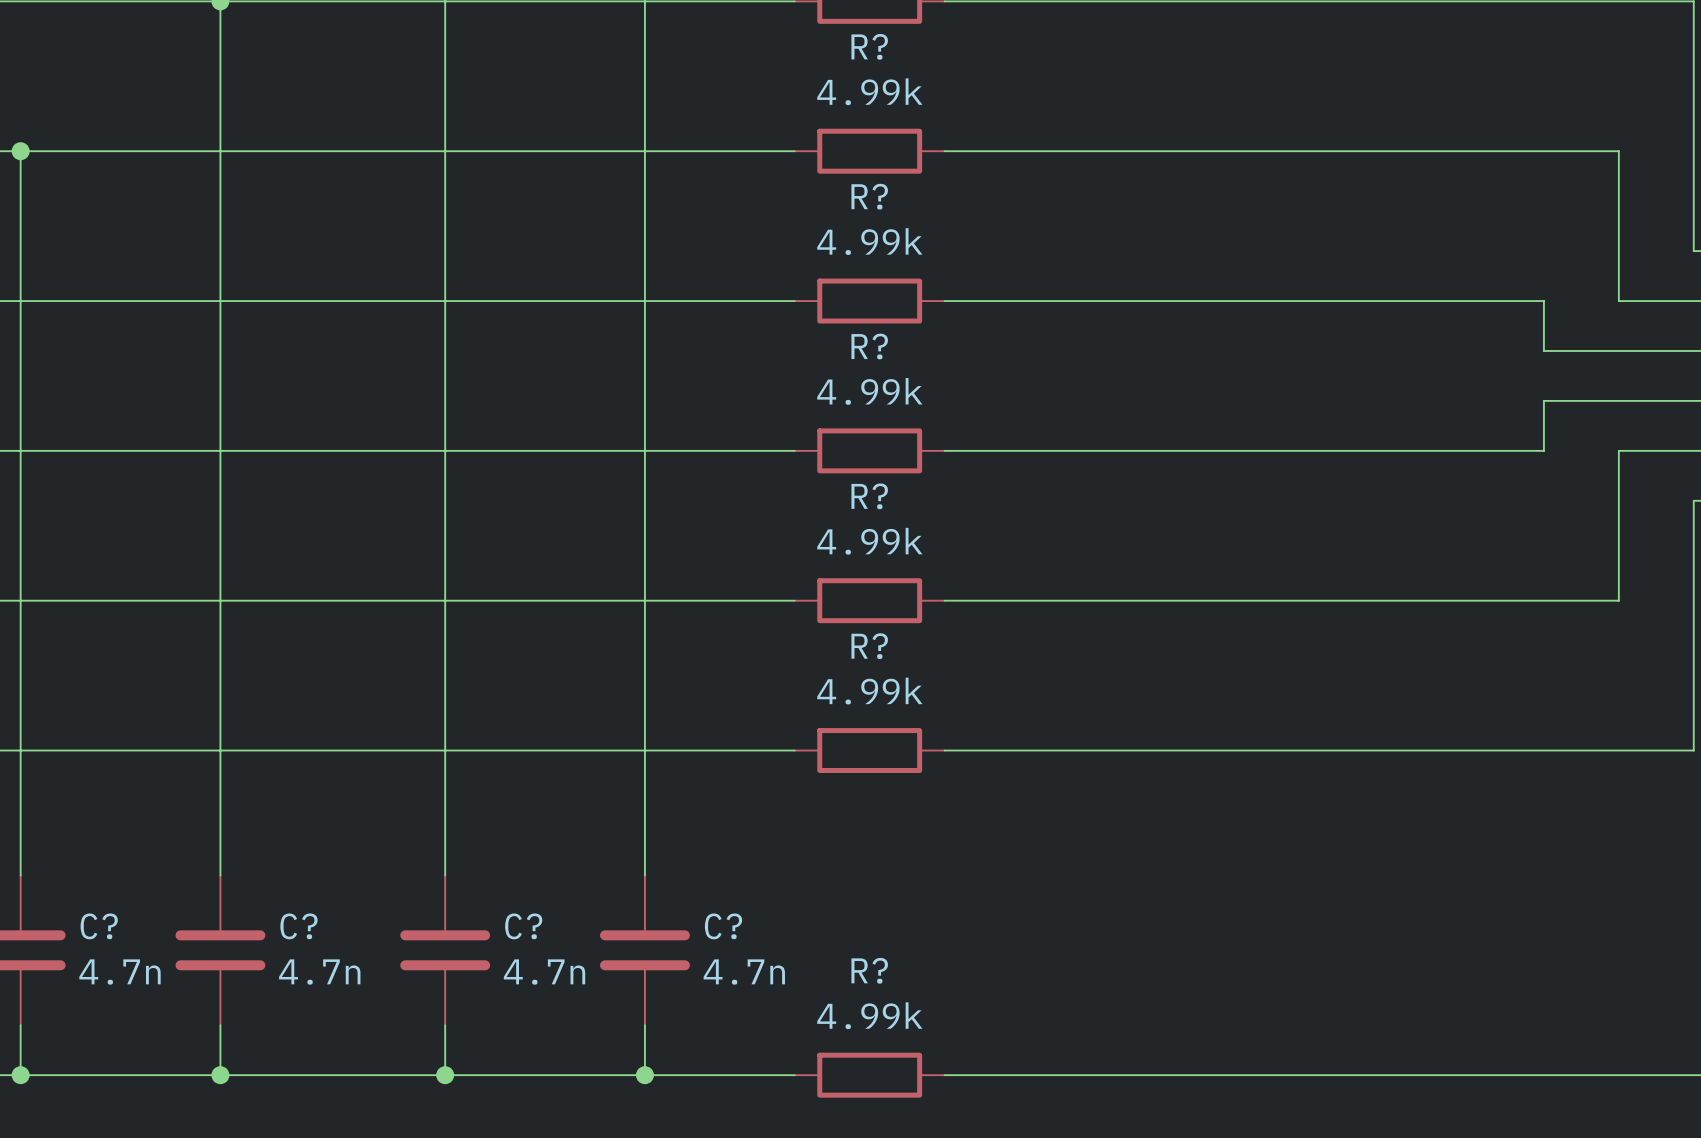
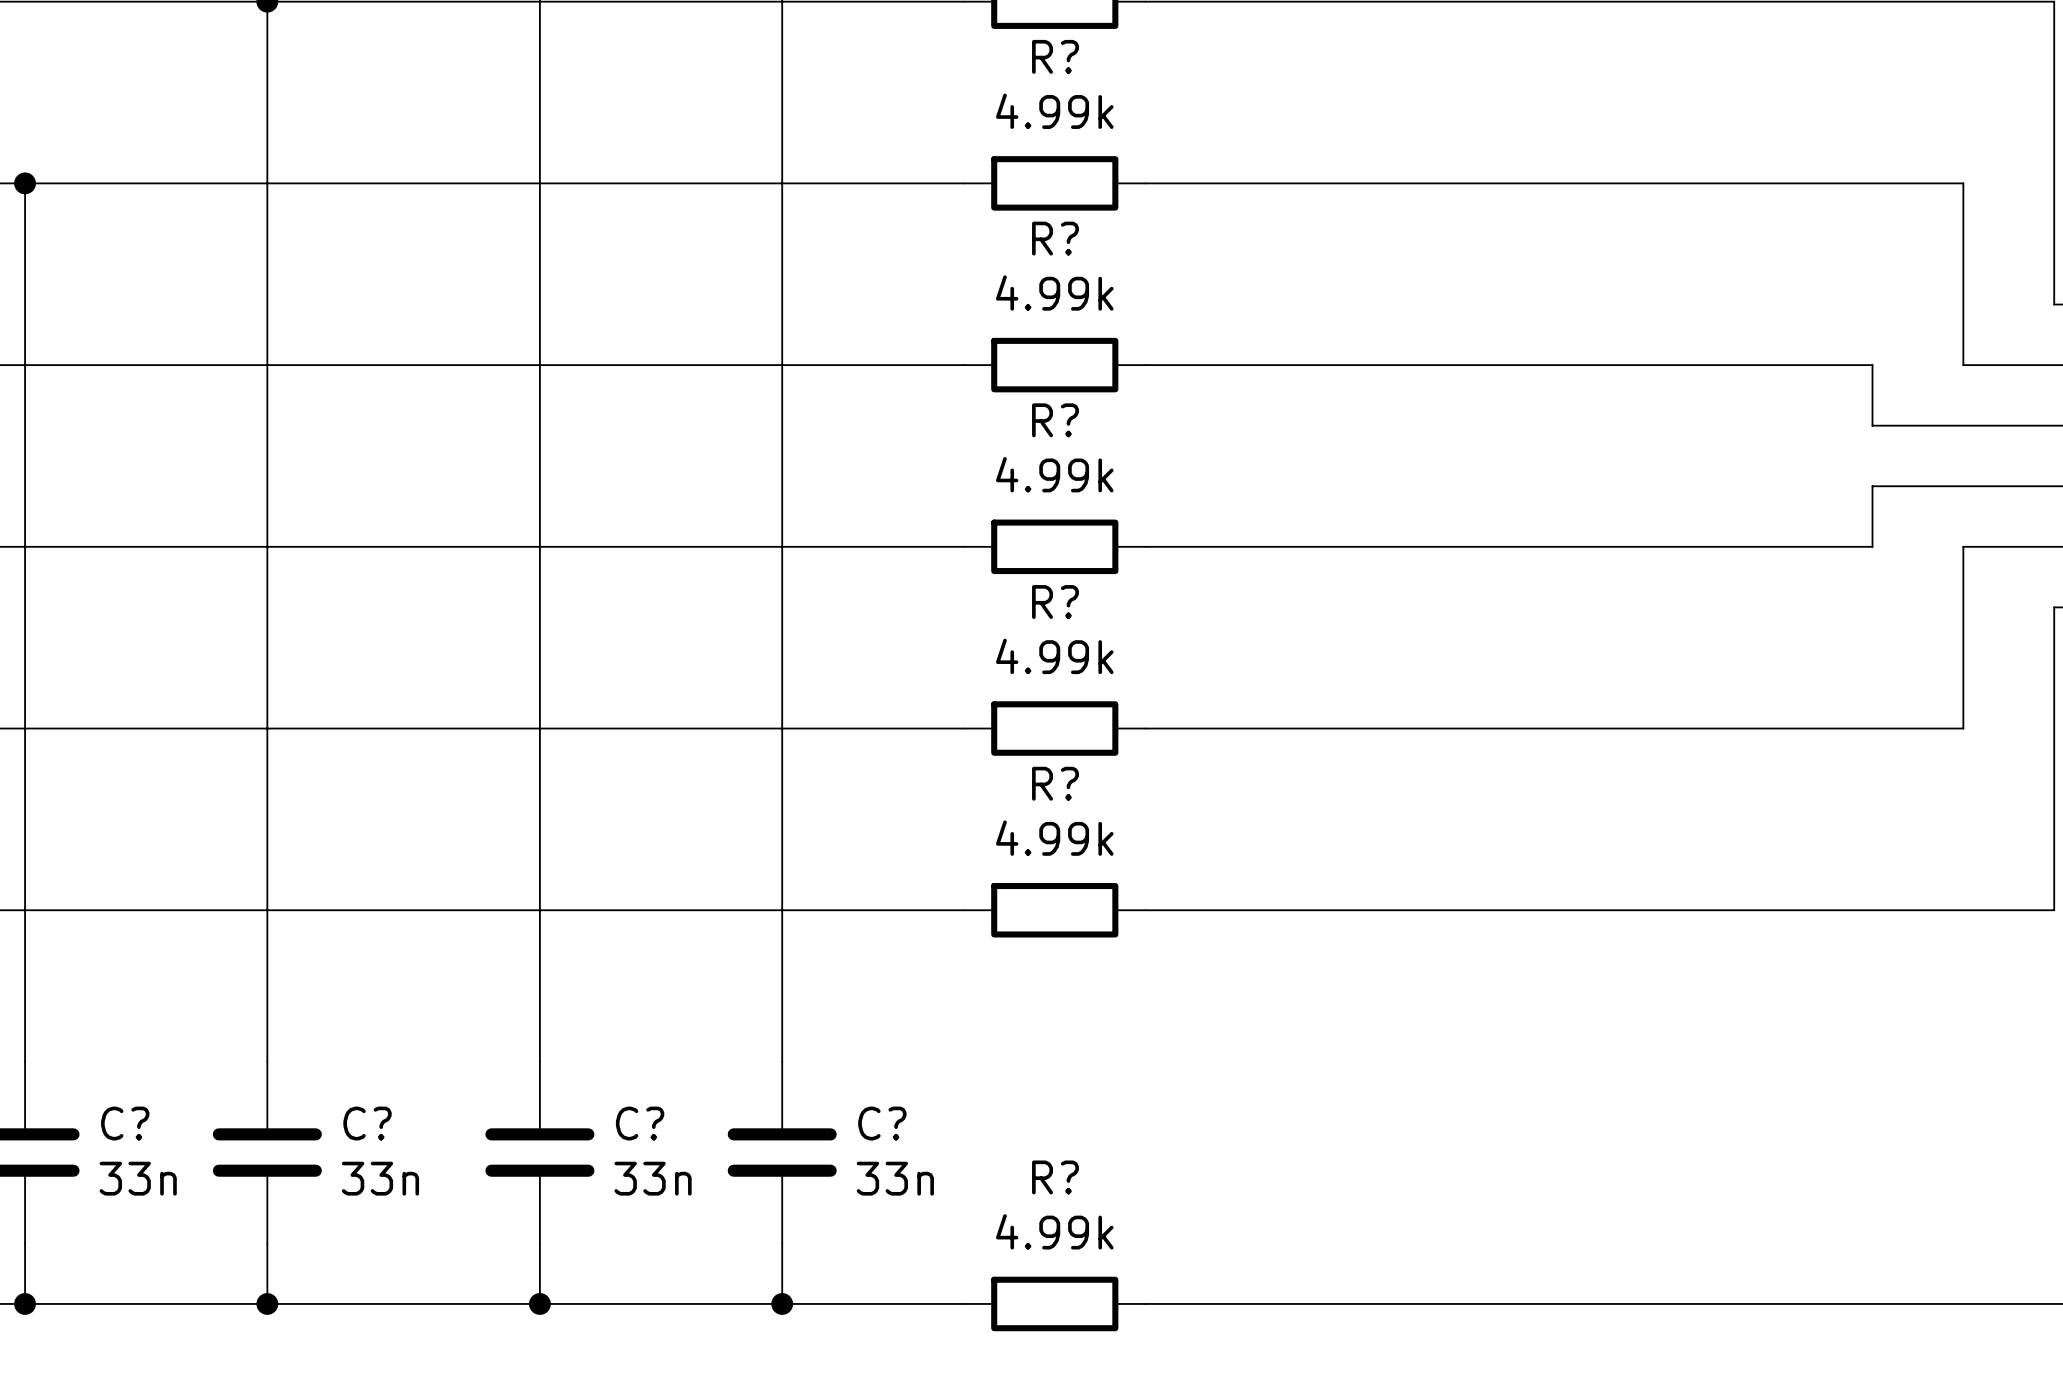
C? value: 4.7n (119, 972) -> 33n (138, 1178)
C? value: 4.7n (319, 972) -> 33n (380, 1178)
C? value: 4.7n (544, 972) -> 33n (653, 1178)
C? value: 4.7n (744, 972) -> 33n (895, 1178)

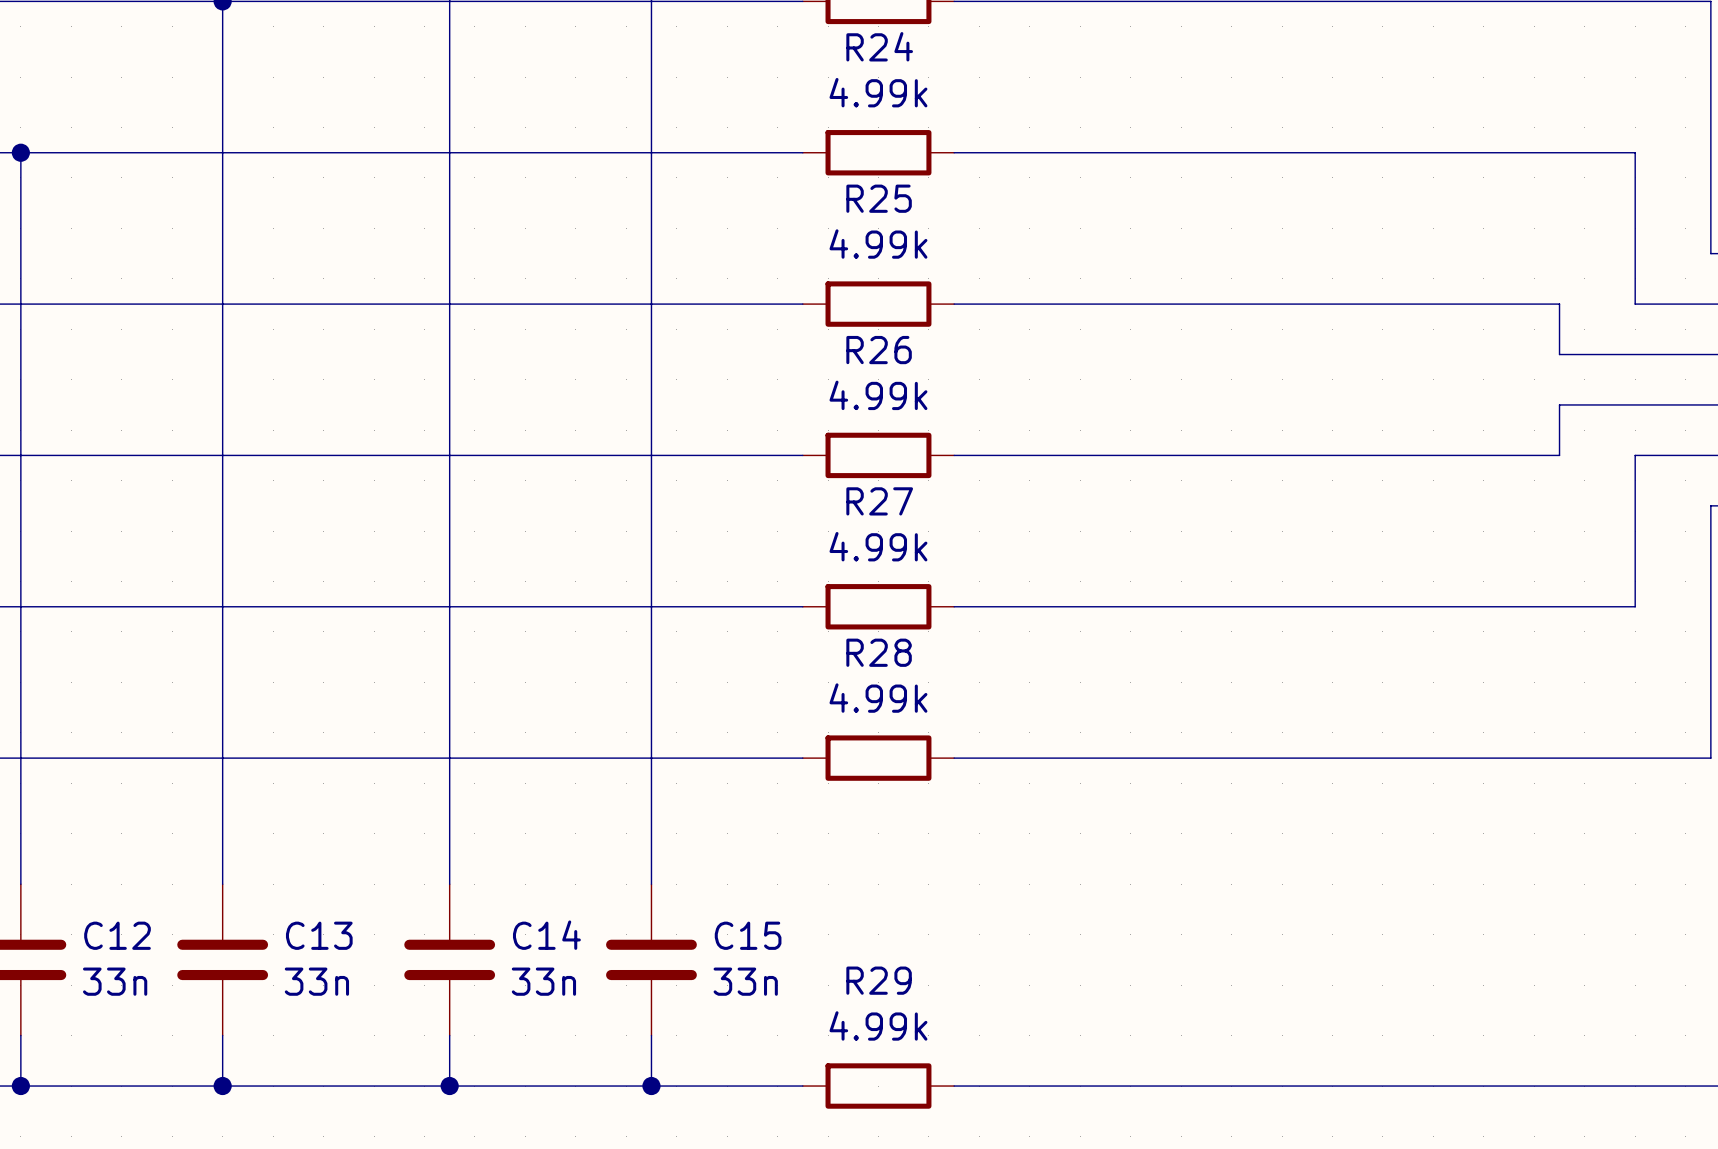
R? name: R? (1055, 56) -> R24 (879, 46)
R? name: R? (1055, 238) -> R25 (879, 198)
R? name: R? (1055, 420) -> R26 (879, 350)
R? name: R? (1055, 602) -> R27 (879, 501)
R? name: R? (1055, 783) -> R28 (879, 652)
C? name: C? (125, 1123) -> C12 (117, 935)
C? name: C? (367, 1123) -> C13 (319, 935)
C? name: C? (640, 1123) -> C14 (546, 935)
C? name: C? (882, 1123) -> C15 (748, 935)
R? name: R? (1055, 1177) -> R29 (879, 980)

